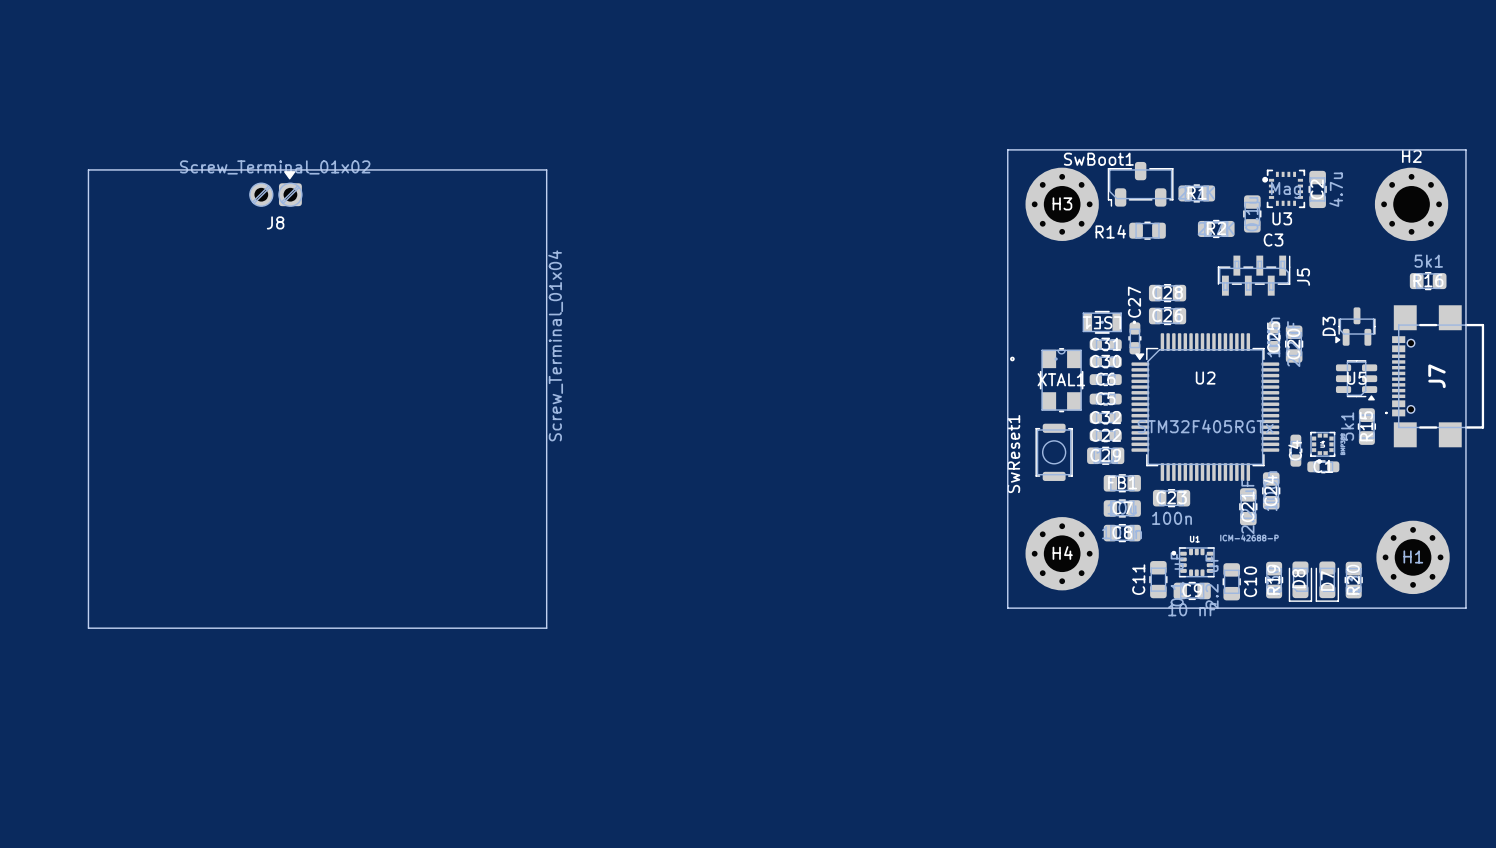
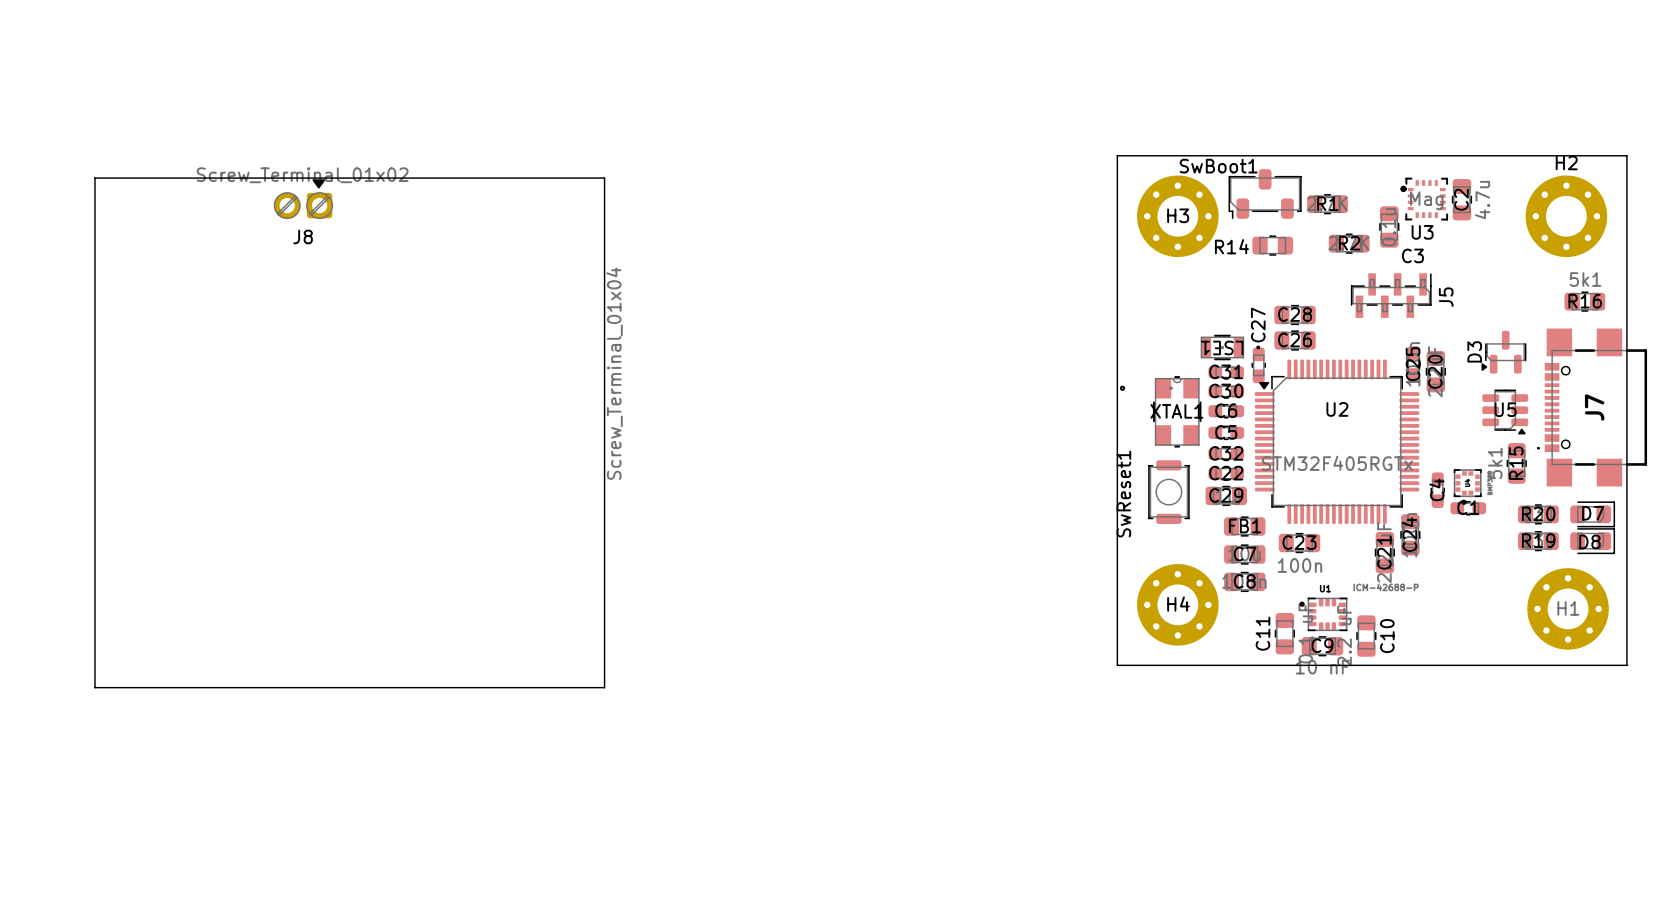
R19 rotation: 0° (1274, 580) -> 90° clockwise (1538, 541)
R19 position: (1274, 580) -> (1538, 541)
R20 rotation: 0° (1353, 580) -> 90° clockwise (1538, 514)
R20 position: (1353, 580) -> (1538, 514)
D8 rotation: 0° (1300, 581) -> 90° counterclockwise (1592, 541)
D8 position: (1300, 581) -> (1592, 541)
D7 rotation: 0° (1327, 581) -> 90° counterclockwise (1592, 514)
D7 position: (1327, 581) -> (1592, 514)

